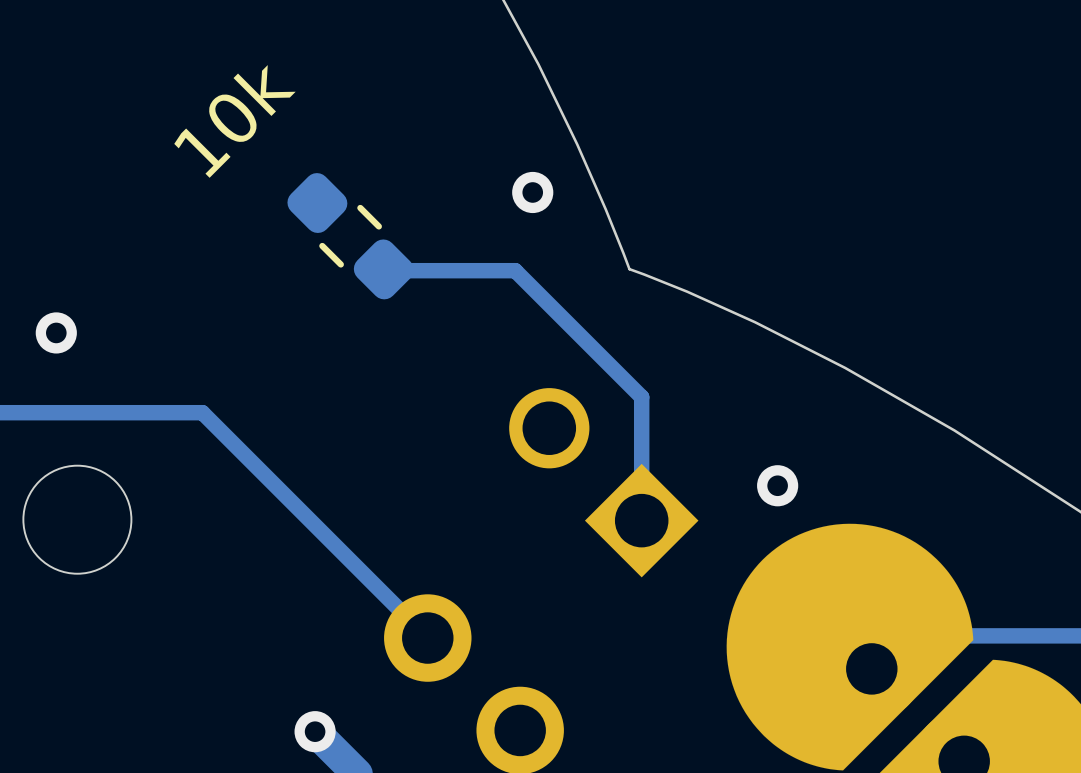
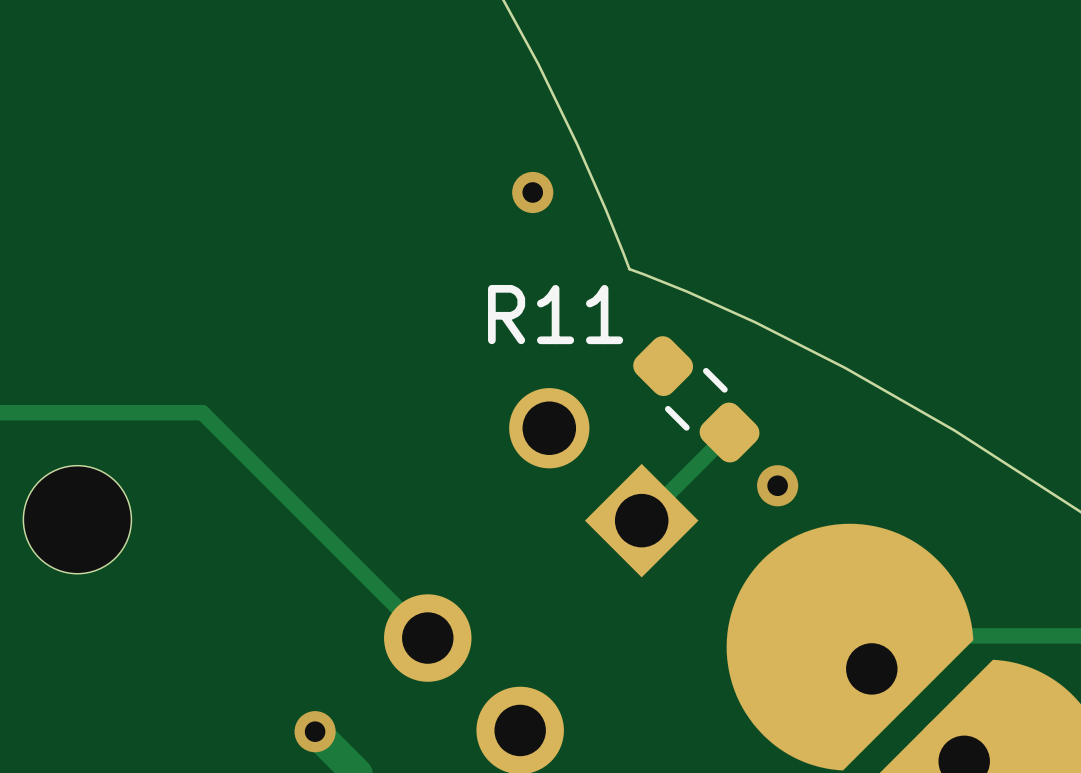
part: 10k (350, 236) -> none
track: (383, 269) (515, 270) (641, 397) (641, 520) -> (726, 429) (726, 435) (641, 520)
via: (56, 332) -> none
R11: none -> (696, 399)

